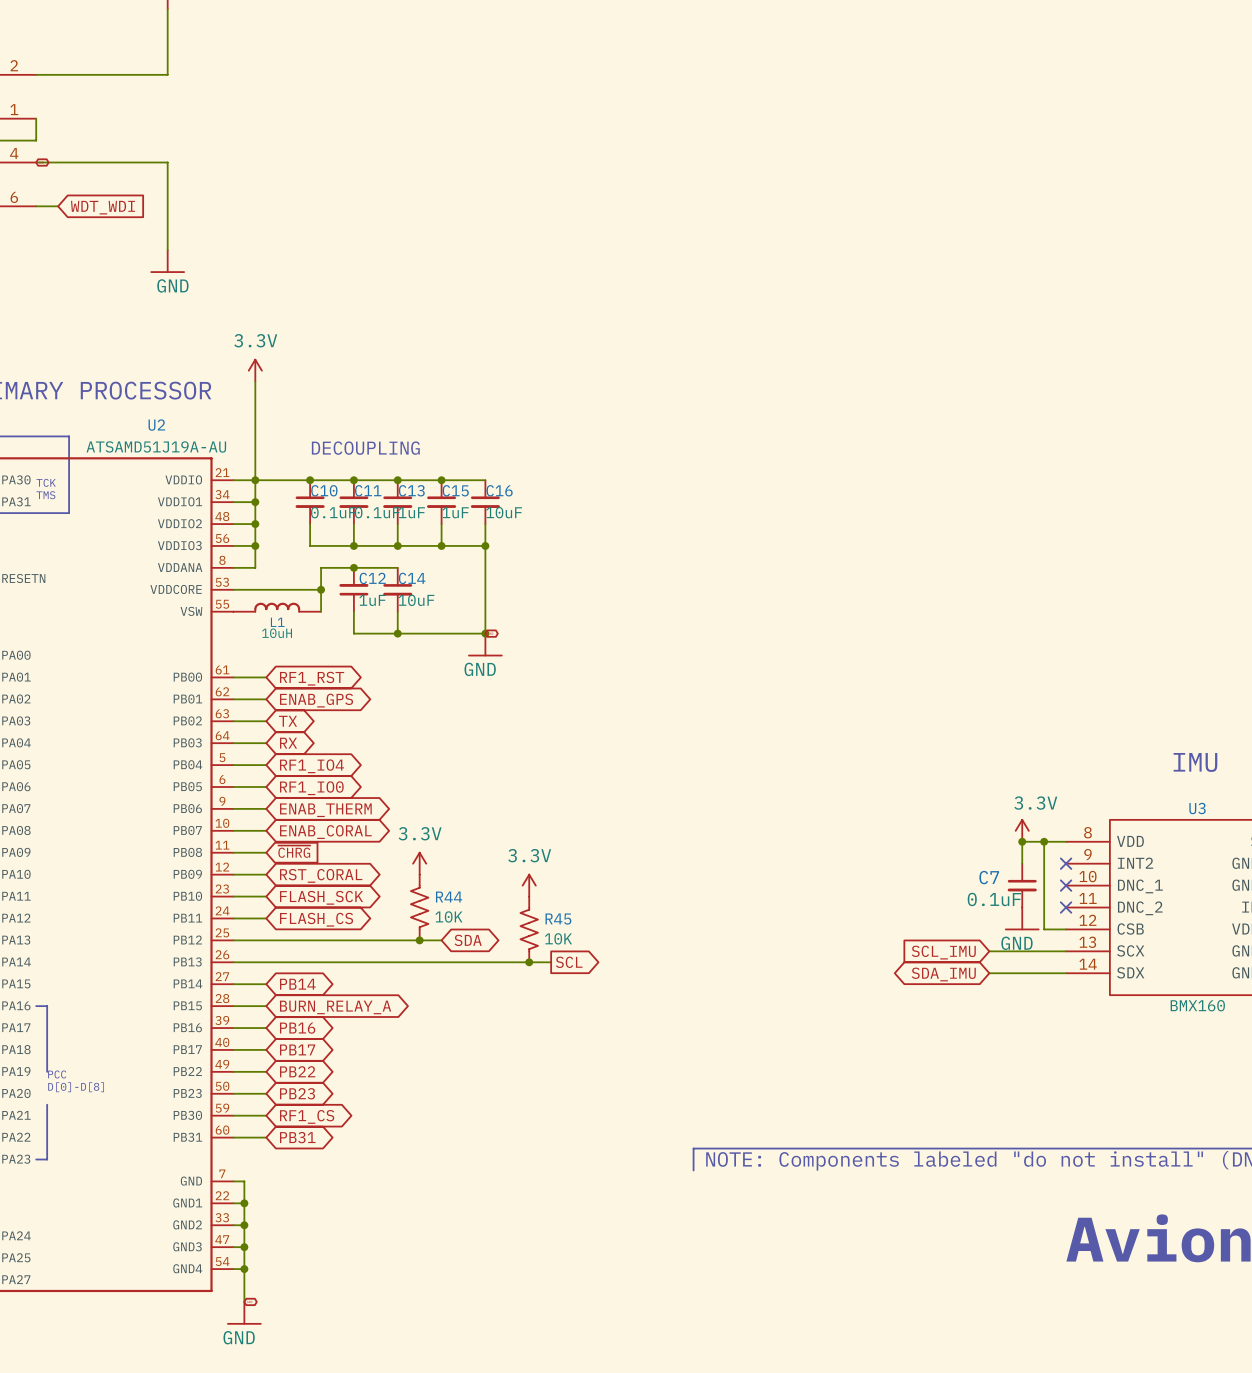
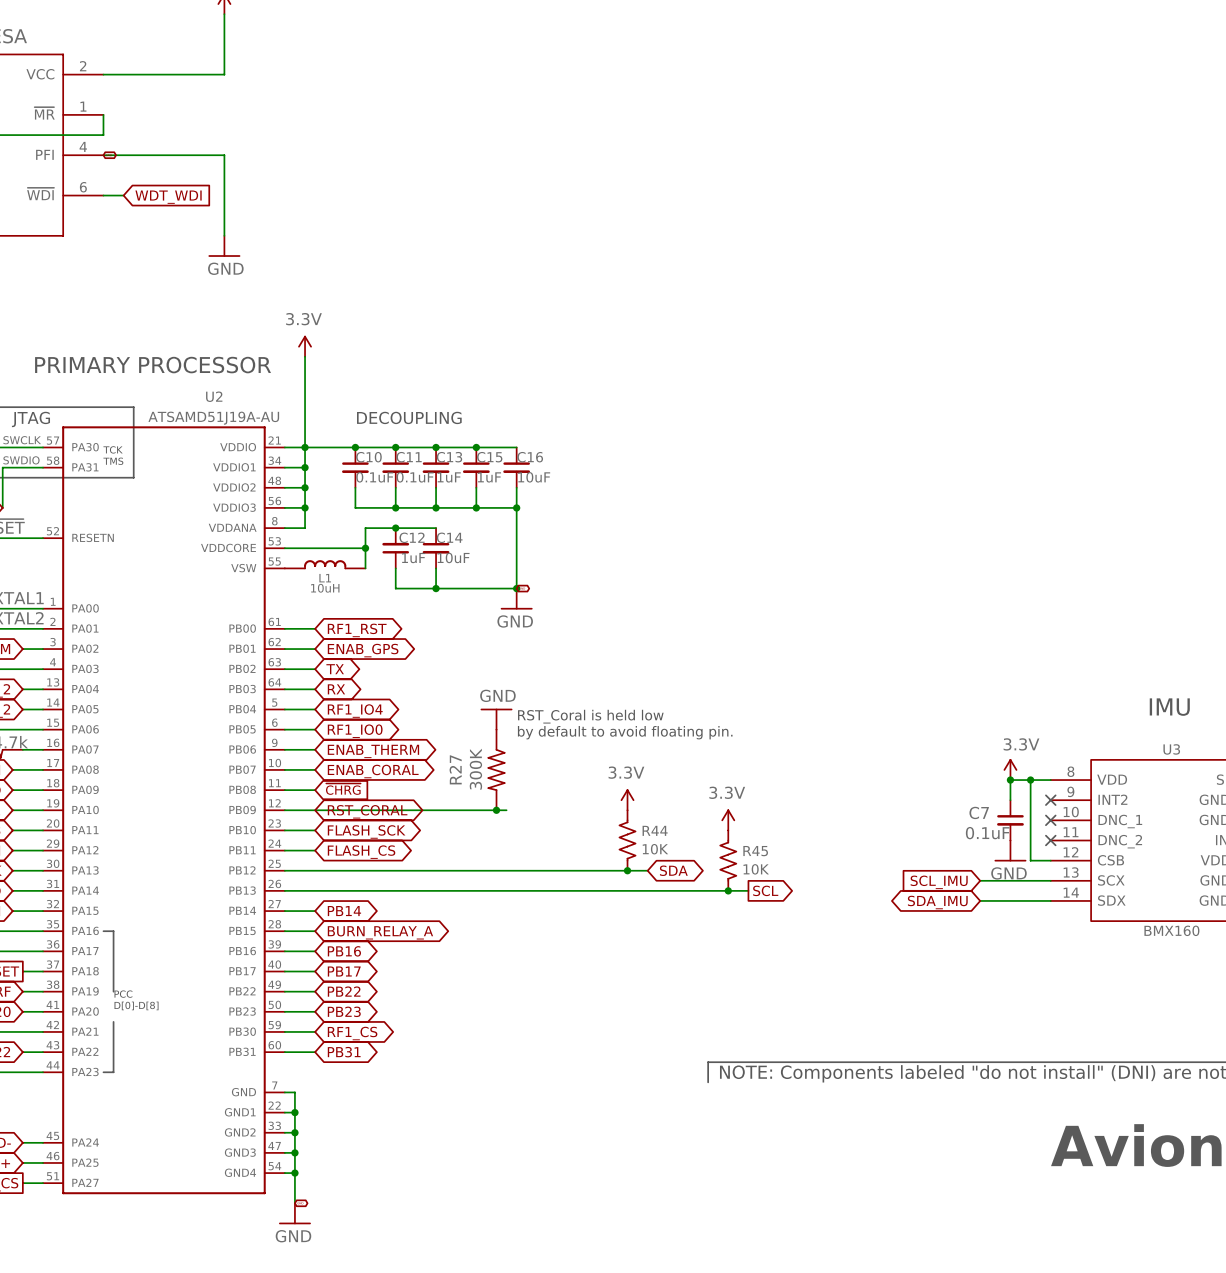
text: none -> RST_Coral is held low (590, 716)
power symbol: none -> GND (496, 719)
text: none -> by default to avoid floating pin. (625, 732)
R27: none -> 300K (496, 769)
power symbol: 3.3V (419, 863) -> none
wire: none -> (315, 810) (506, 810)
junction: none -> (496, 810)
power symbol position: 3.3V (529, 885) -> 3.3V (627, 800)
power symbol: none -> 3.3V (728, 820)
R44 position: (419, 907) -> (627, 840)
R45 position: (529, 929) -> (728, 860)
junction: (419, 940) -> none
wire: none -> (476, 870) (647, 870)
global label position: SDA (468, 940) -> SDA (673, 870)
junction: none -> (627, 870)
junction: (529, 962) -> none
wire: none -> (577, 890) (748, 890)
global label position: SCL (569, 962) -> SCL (765, 890)
junction: none -> (728, 890)

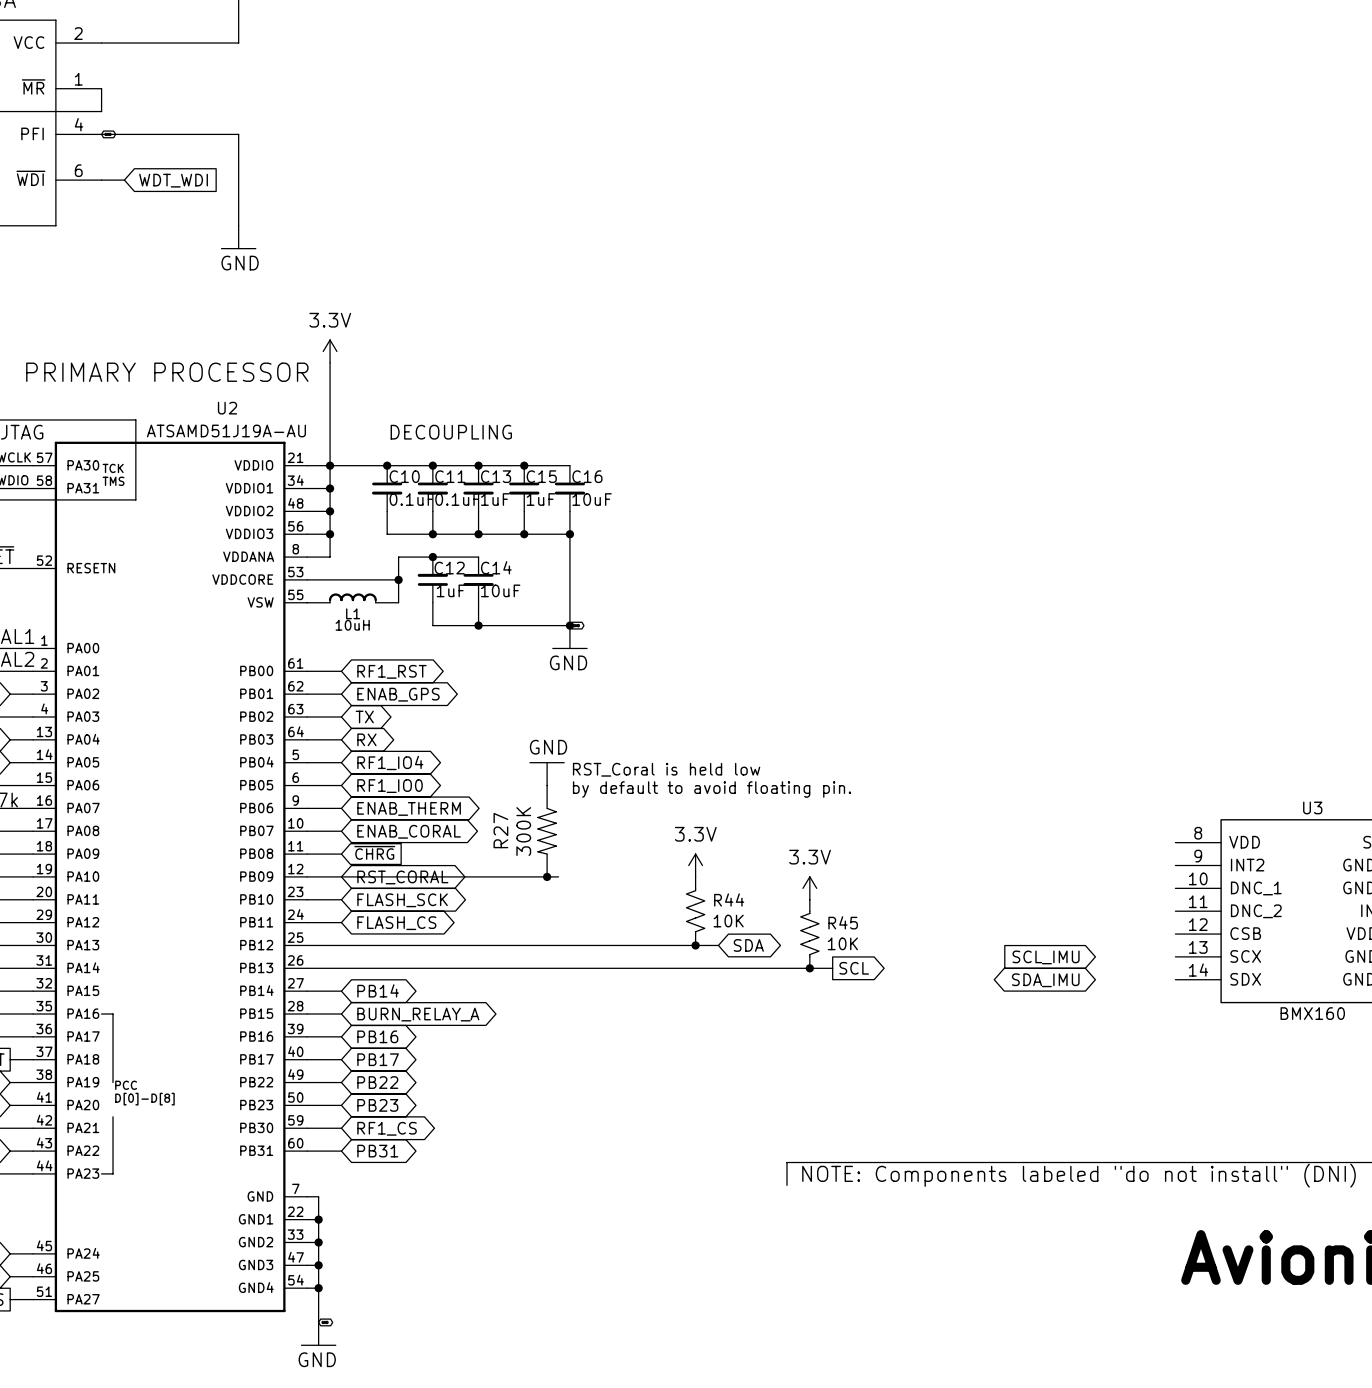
text: IMU (1169, 707) -> none
power symbol: 3.3V (1010, 769) -> none
junction: (1010, 780) -> none
wire: (1030, 780) (1030, 860) (1050, 860) -> none
junction: (1030, 780) -> none
wire: (1050, 780) (1010, 780) (1010, 800) -> none
no-connect mark: (1050, 800) -> none
C7: 0.1uF (1010, 820) -> none
no-connect mark: (1050, 820) -> none
no-connect mark: (1050, 840) -> none
power symbol: GND (1010, 850) -> none
wire: (980, 880) (1050, 880) -> none
wire: (980, 900) (1050, 900) -> none

